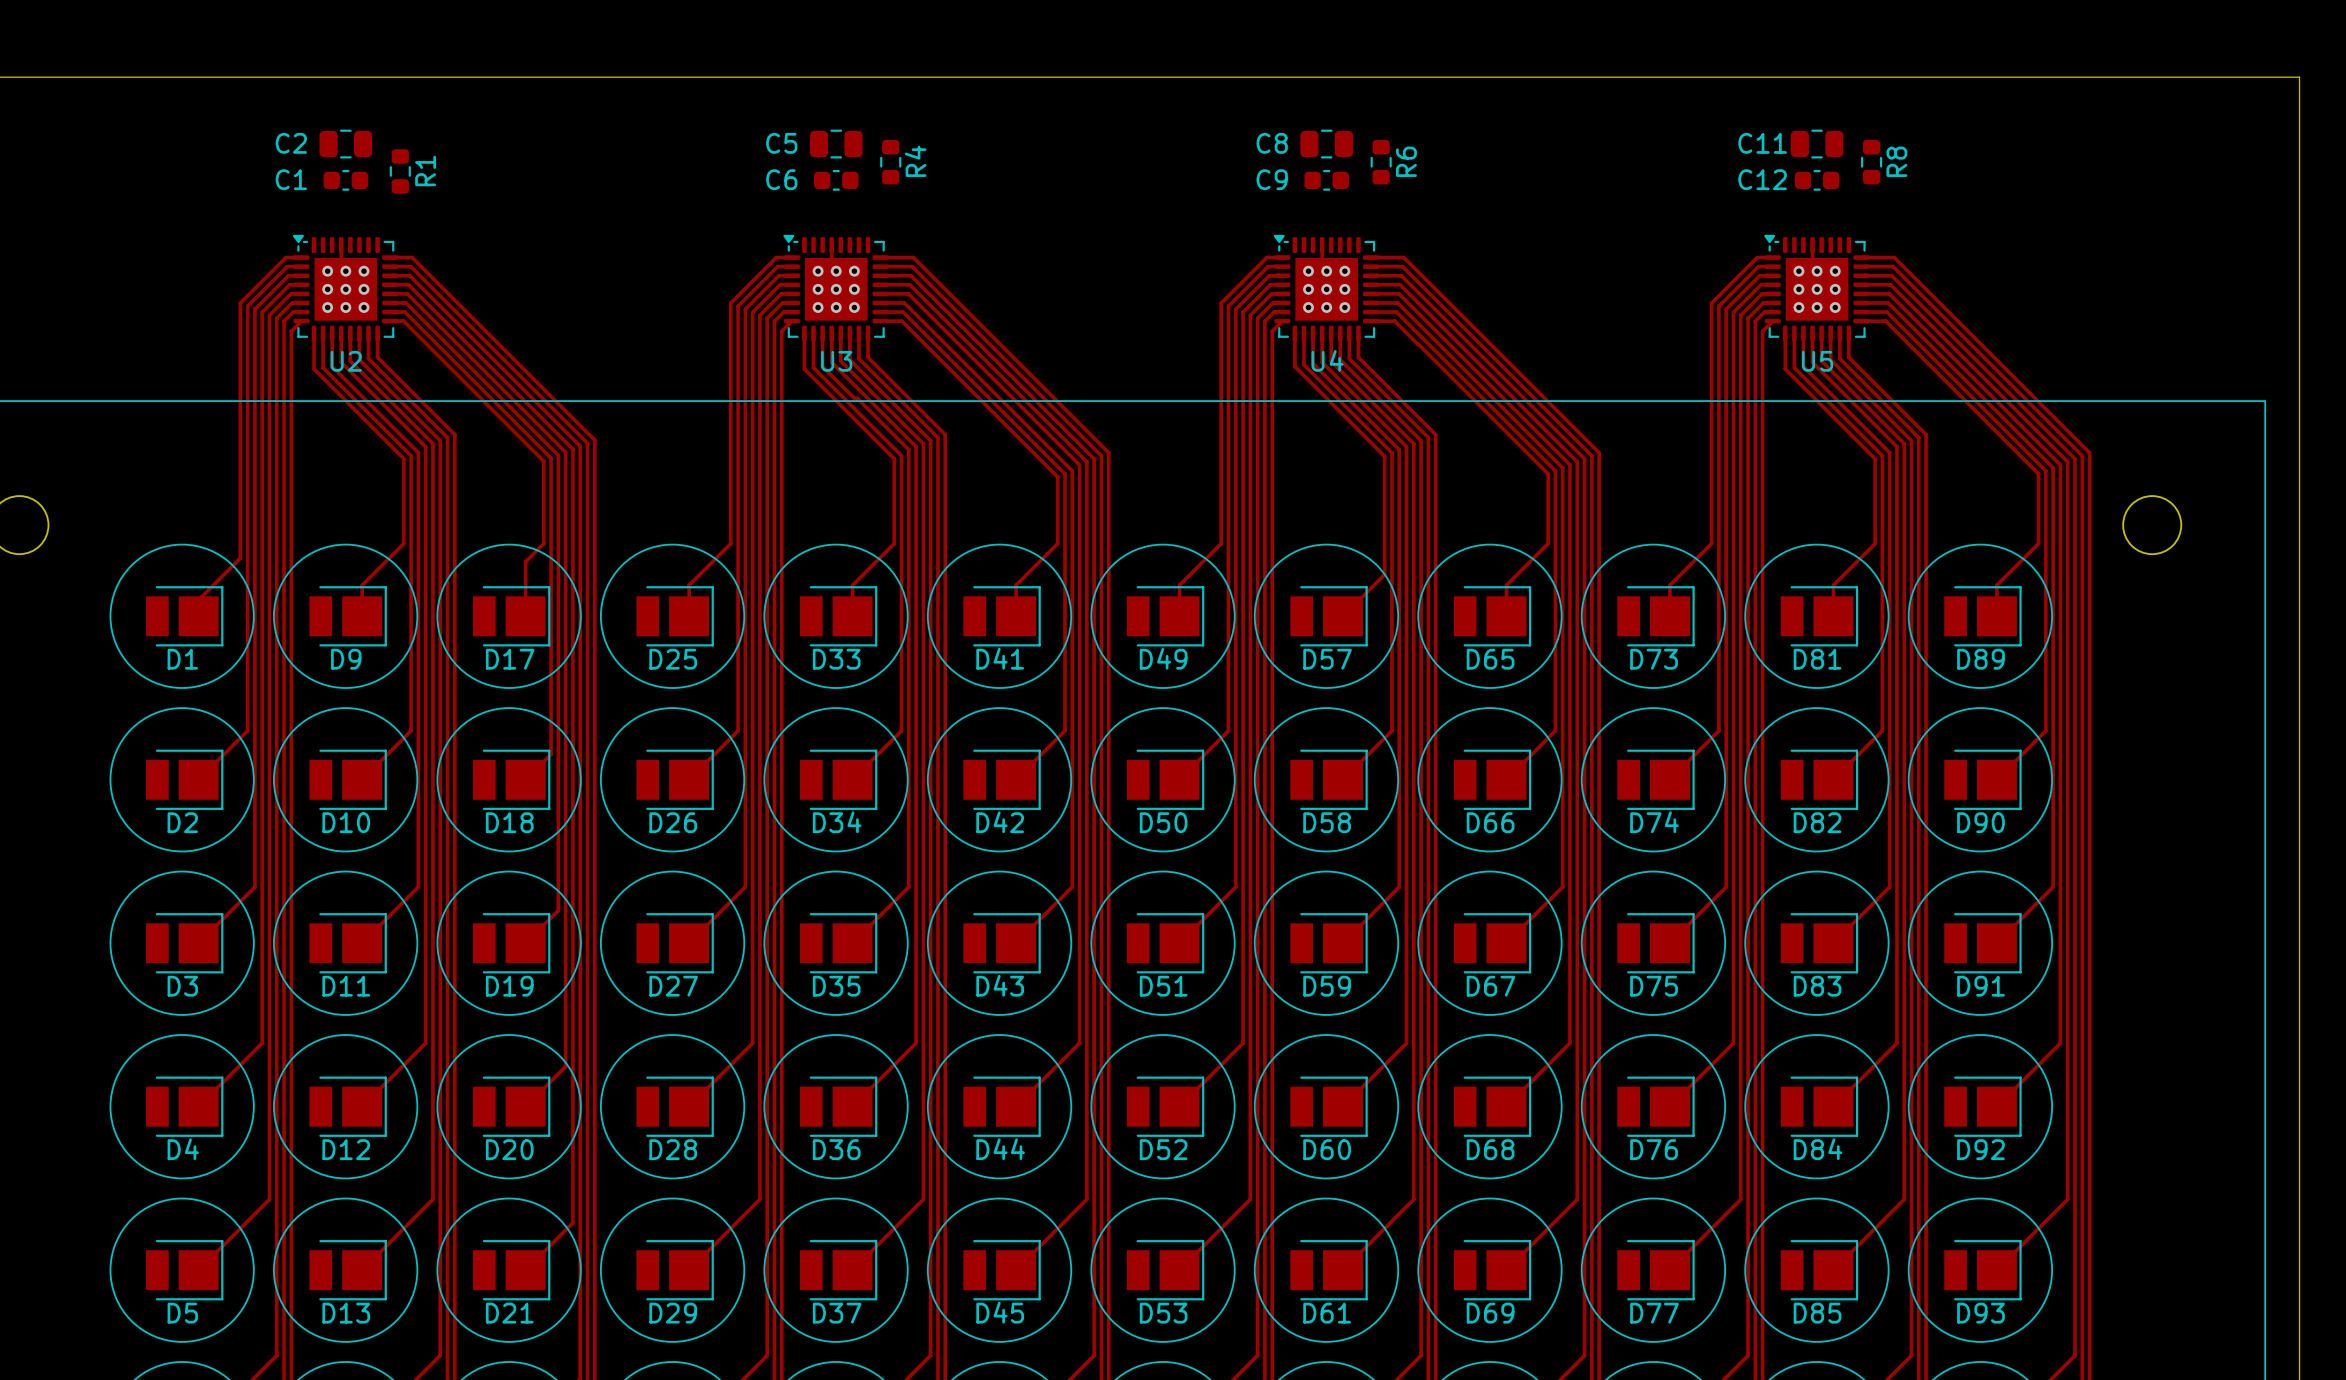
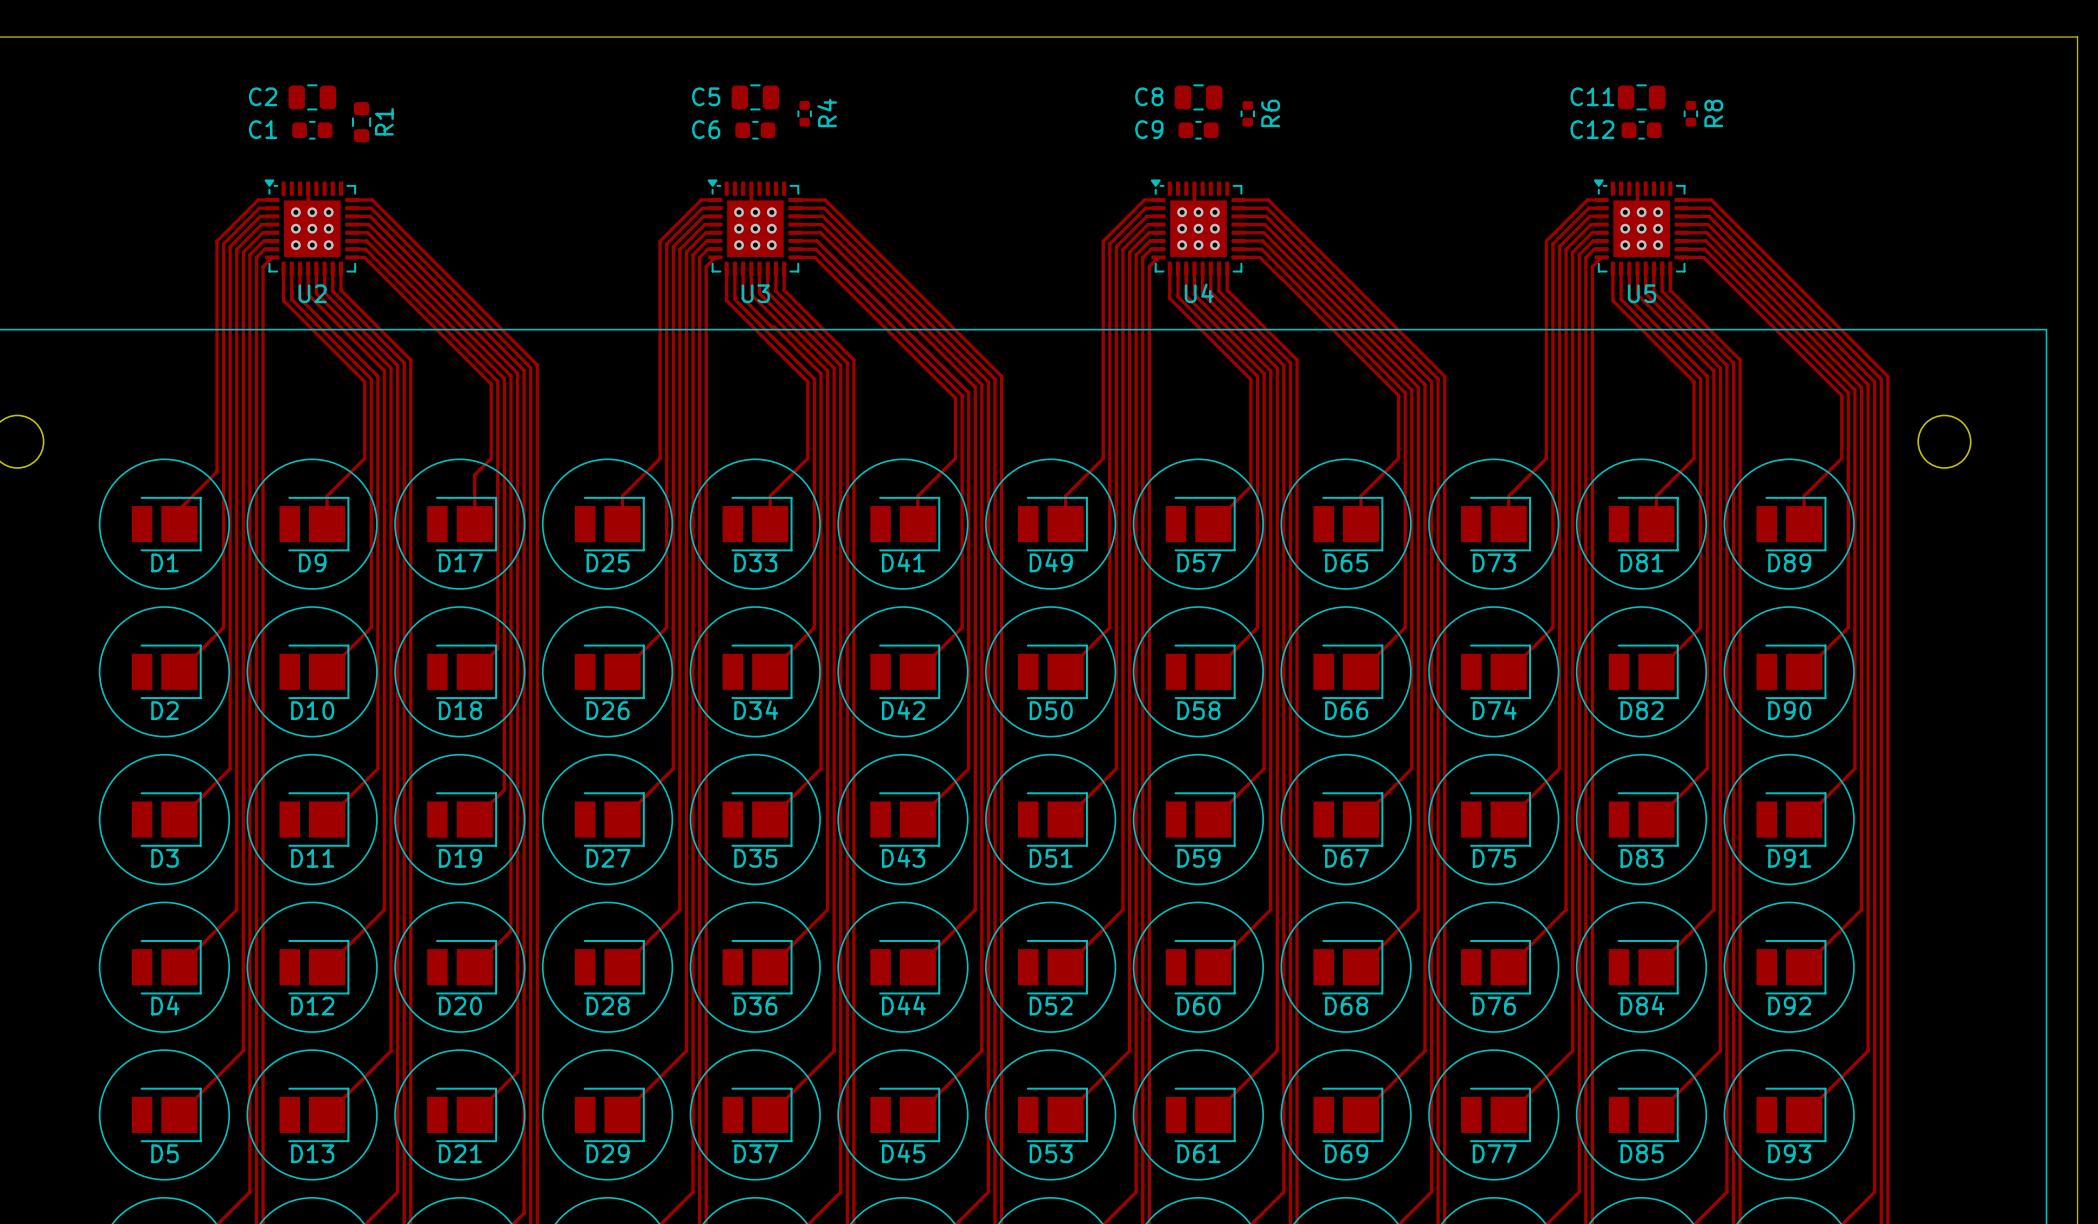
R4 footprint: [880, 139, 902, 185] -> [797, 101, 812, 127]
R6 footprint: [1370, 139, 1392, 185] -> [1240, 101, 1255, 127]
R8 footprint: [1861, 139, 1883, 185] -> [1683, 101, 1699, 127]

